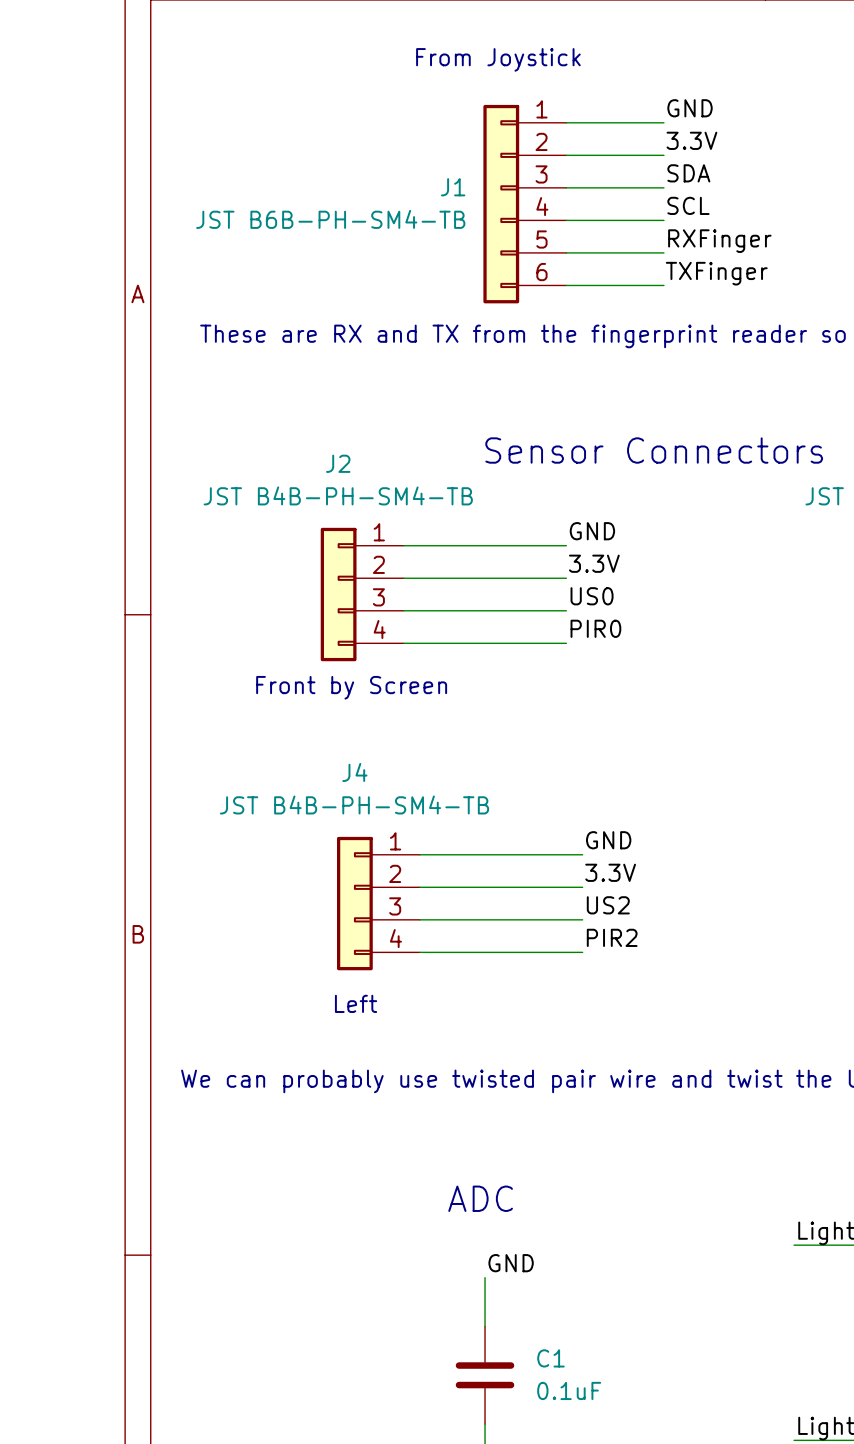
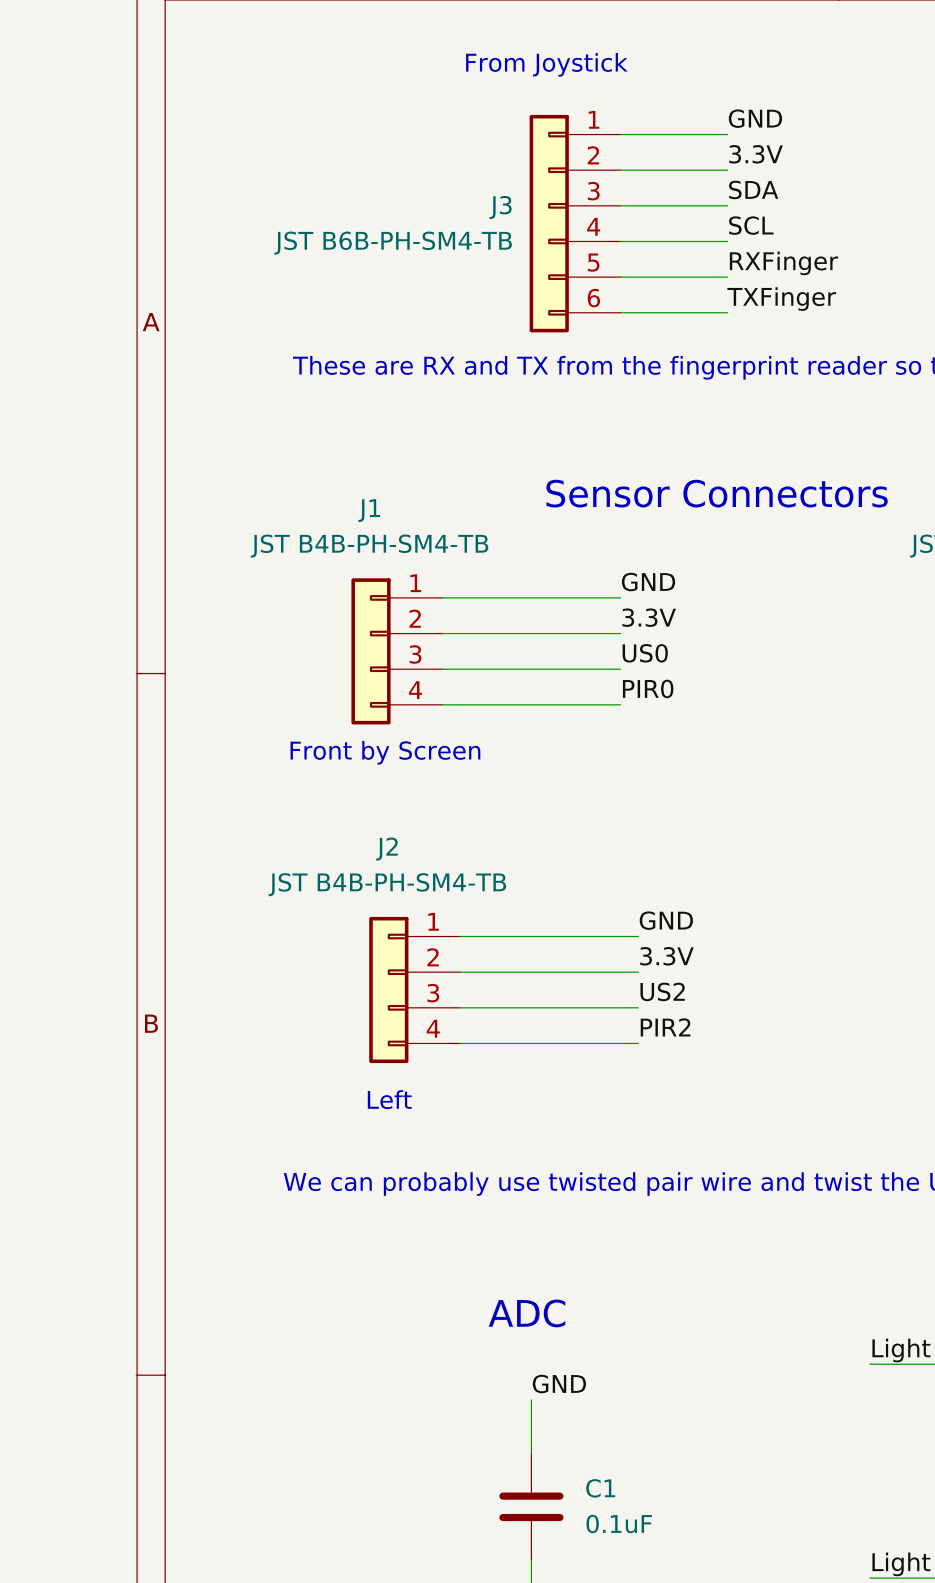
J1 name: J1 (453, 187) -> J3 (500, 207)
J2 name: J2 (338, 463) -> J1 (369, 510)
J4 name: J4 (354, 772) -> J2 (386, 849)

